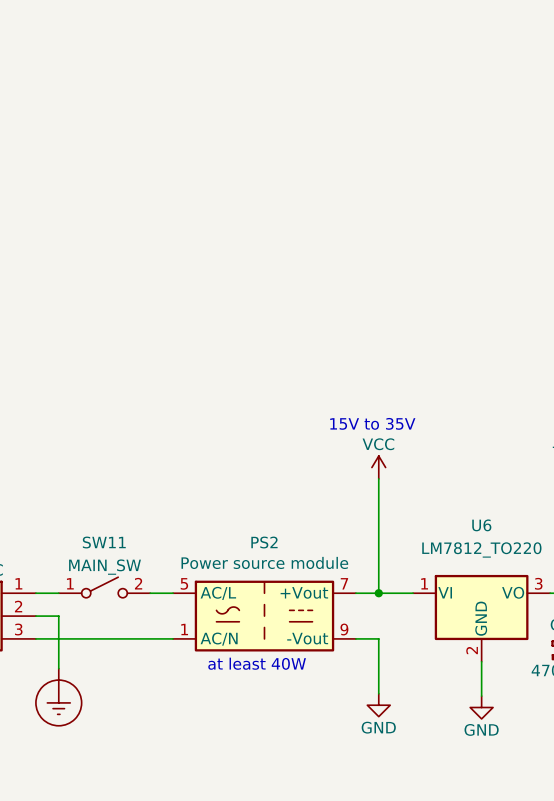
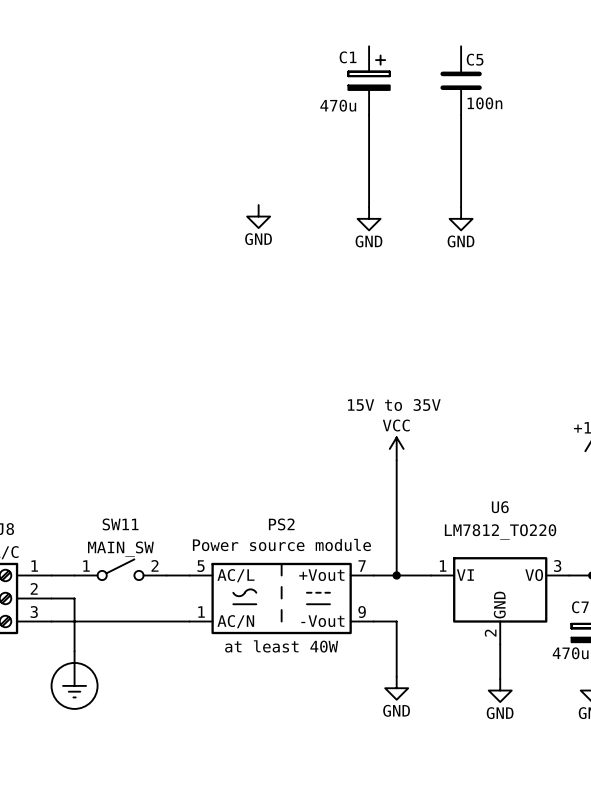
C1: none -> 470u (369, 80)
C5: none -> 100n (461, 80)
wire: none -> (369, 115) (369, 207)
wire: none -> (461, 115) (461, 207)
power symbol: none -> GND (258, 216)
power symbol: none -> GND (369, 218)
power symbol: none -> GND (461, 218)

